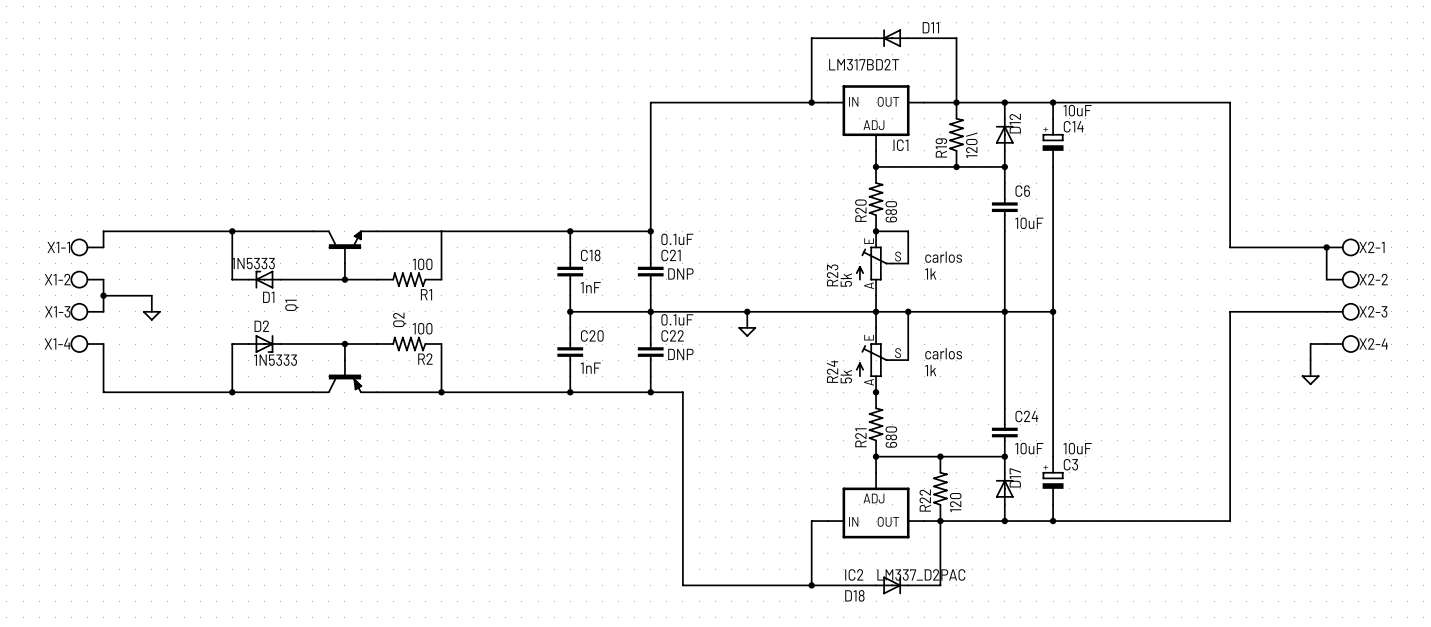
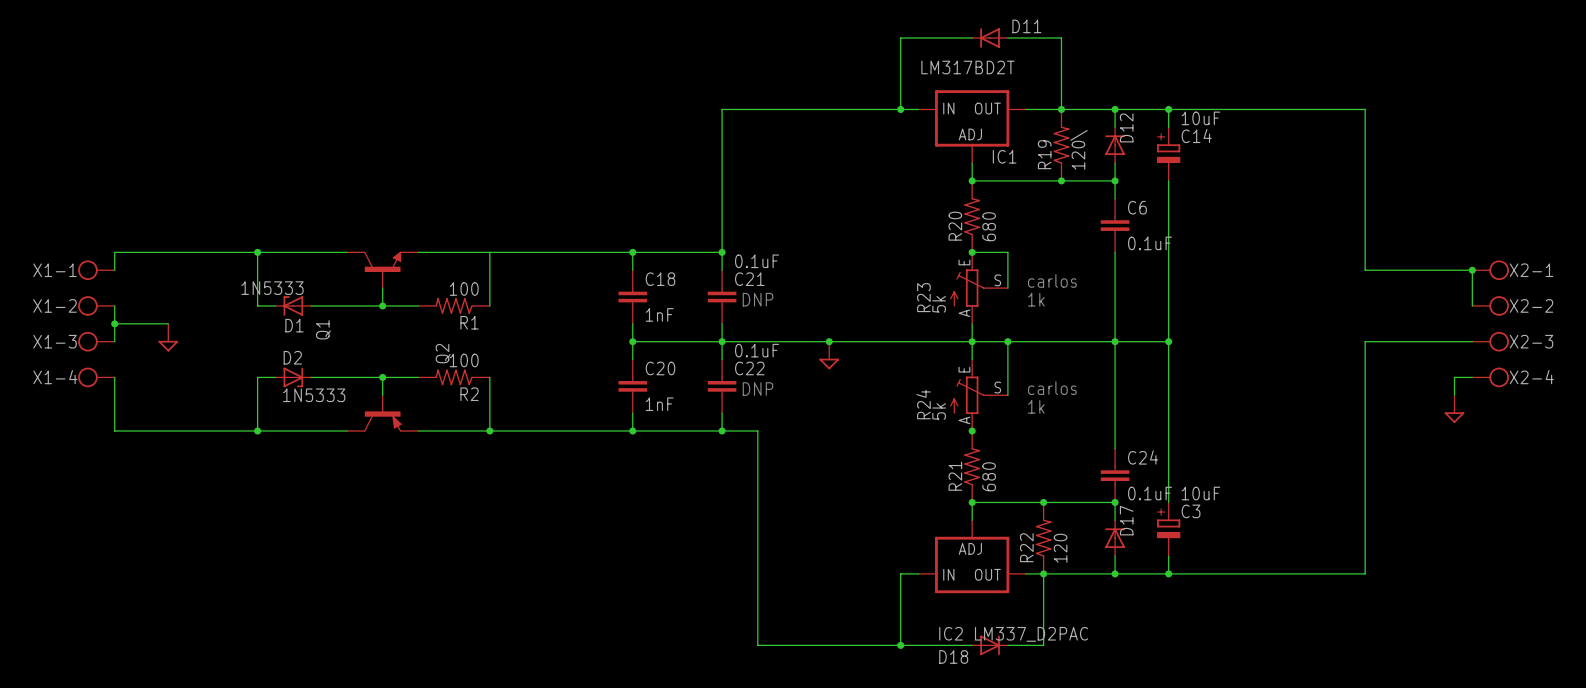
C6 value: 10uF (1029, 223) -> 0.1uF (1150, 243)
C24 value: 10uF (1029, 448) -> 0.1uF (1150, 493)

